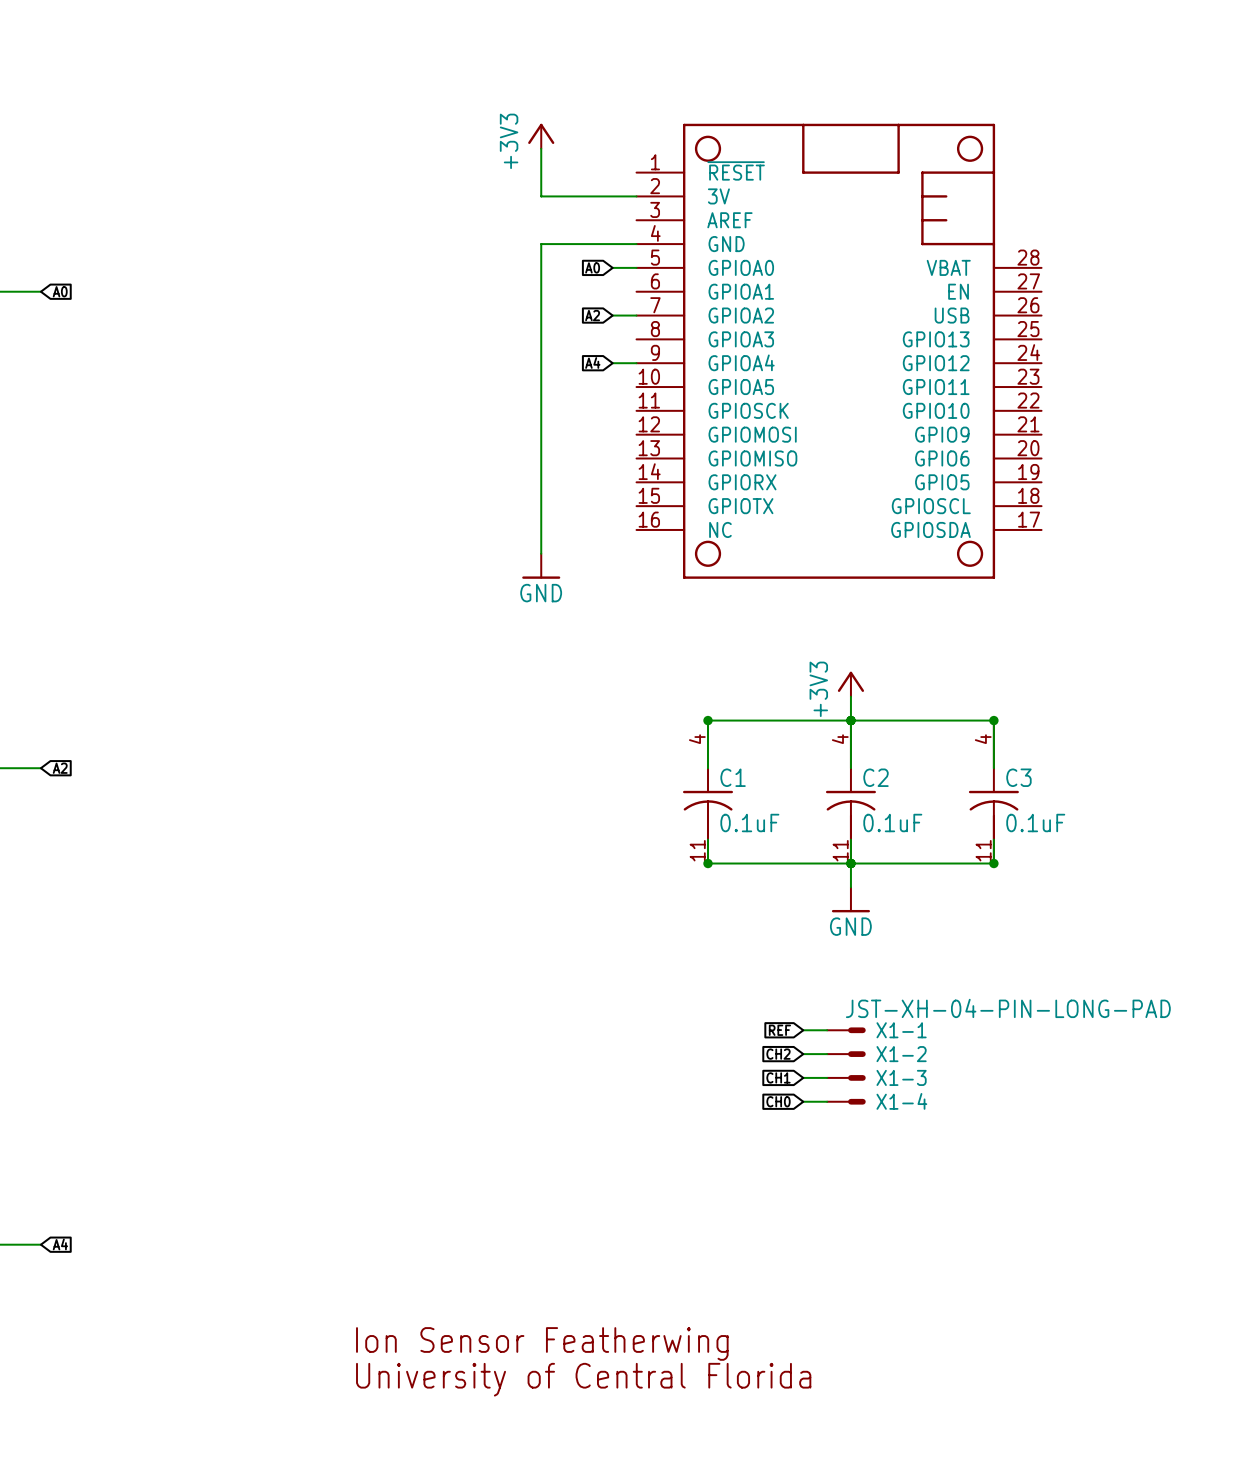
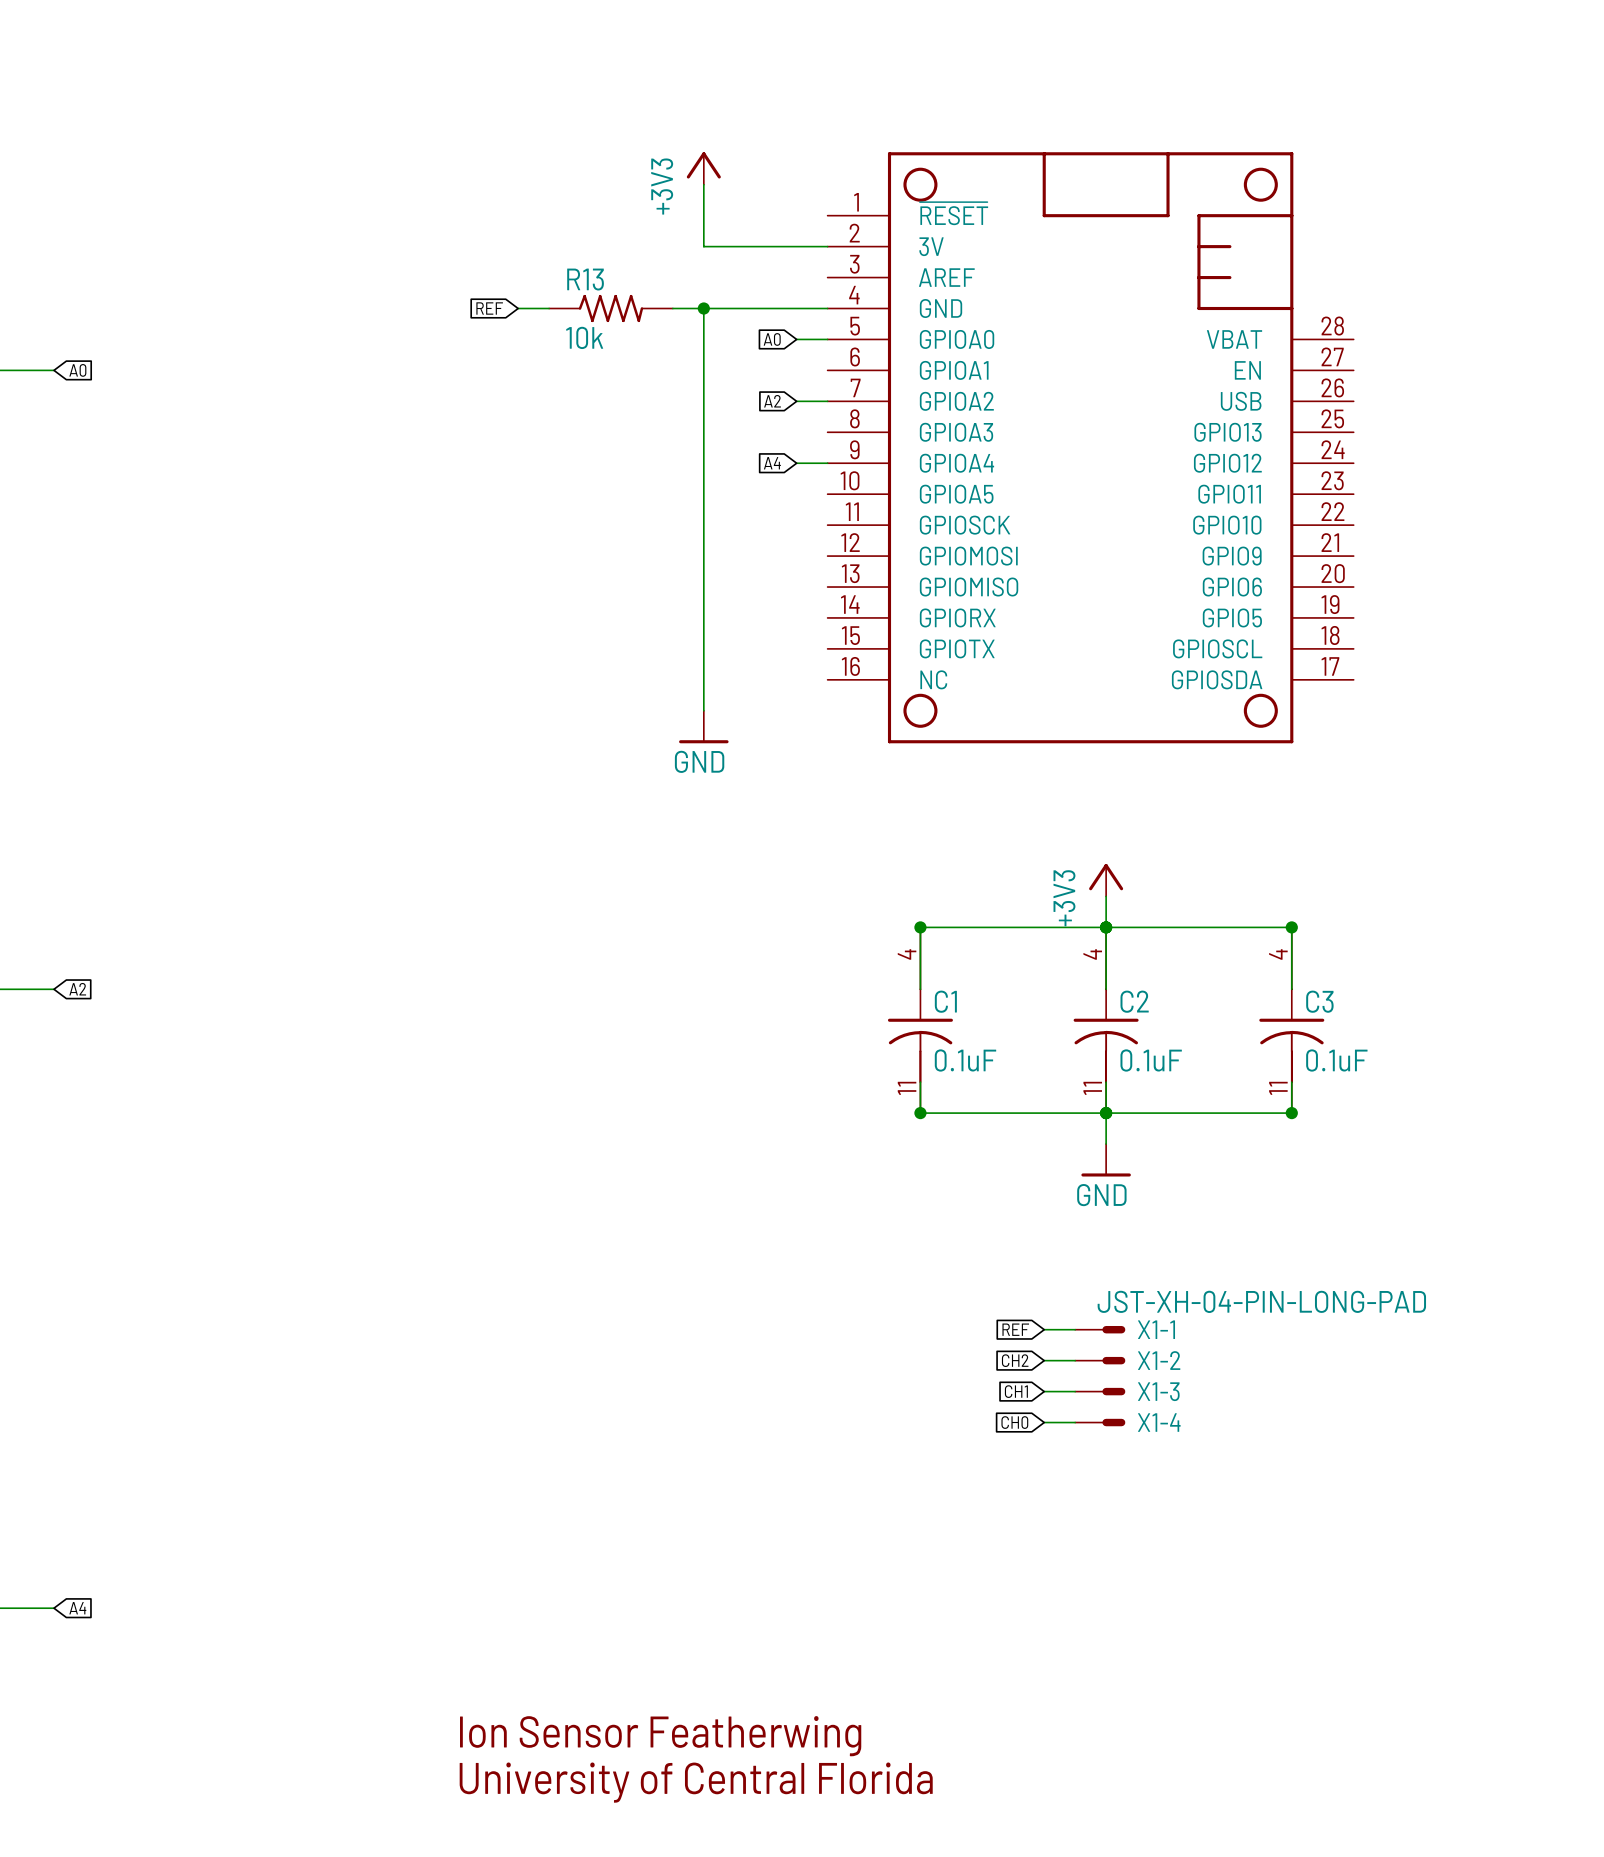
global label: none -> REF (489, 308)
wire: none -> (518, 308) (549, 308)
R13: none -> 10k (610, 308)
wire: none -> (672, 308) (703, 308)
junction: none -> (703, 308)

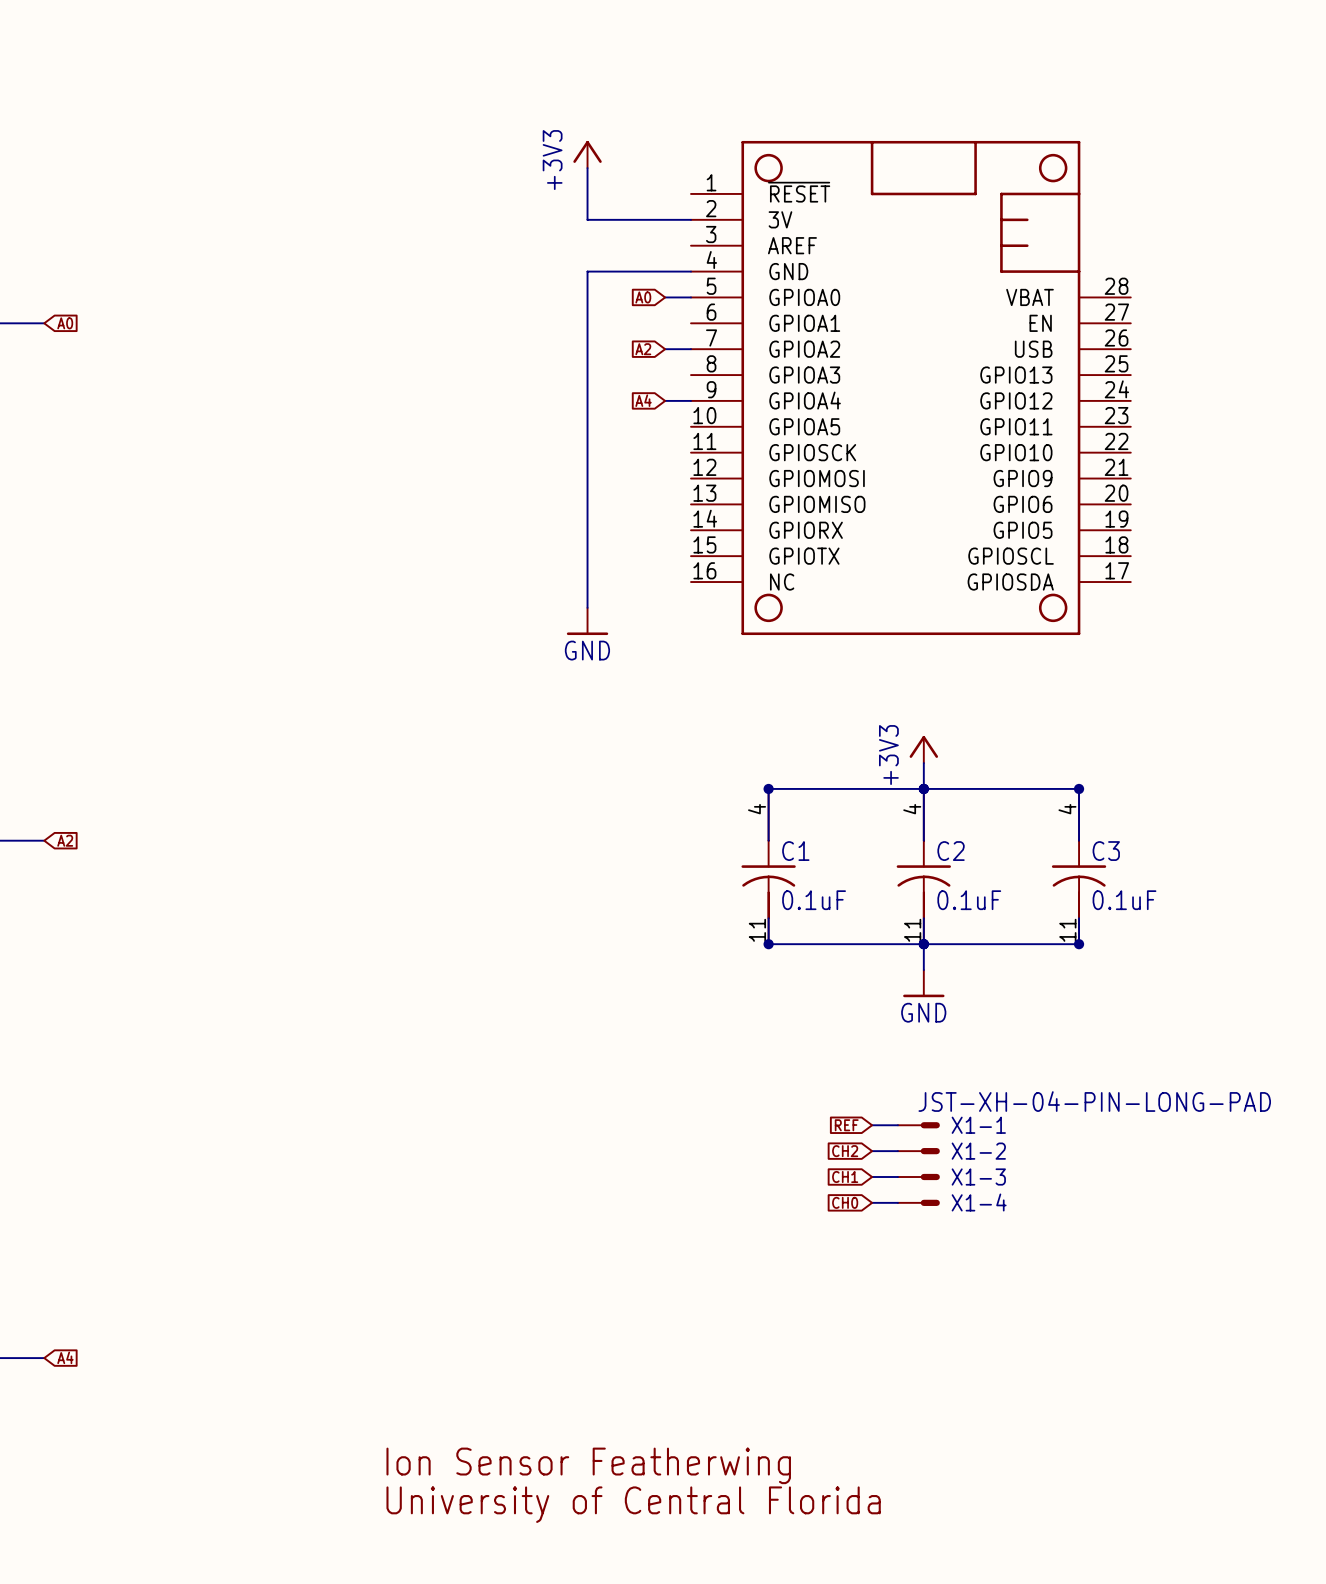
global label: REF (489, 308) -> none
wire: (518, 308) (549, 308) -> none
R13: 10k (610, 308) -> none
wire: (672, 308) (703, 308) -> none
junction: (703, 308) -> none

